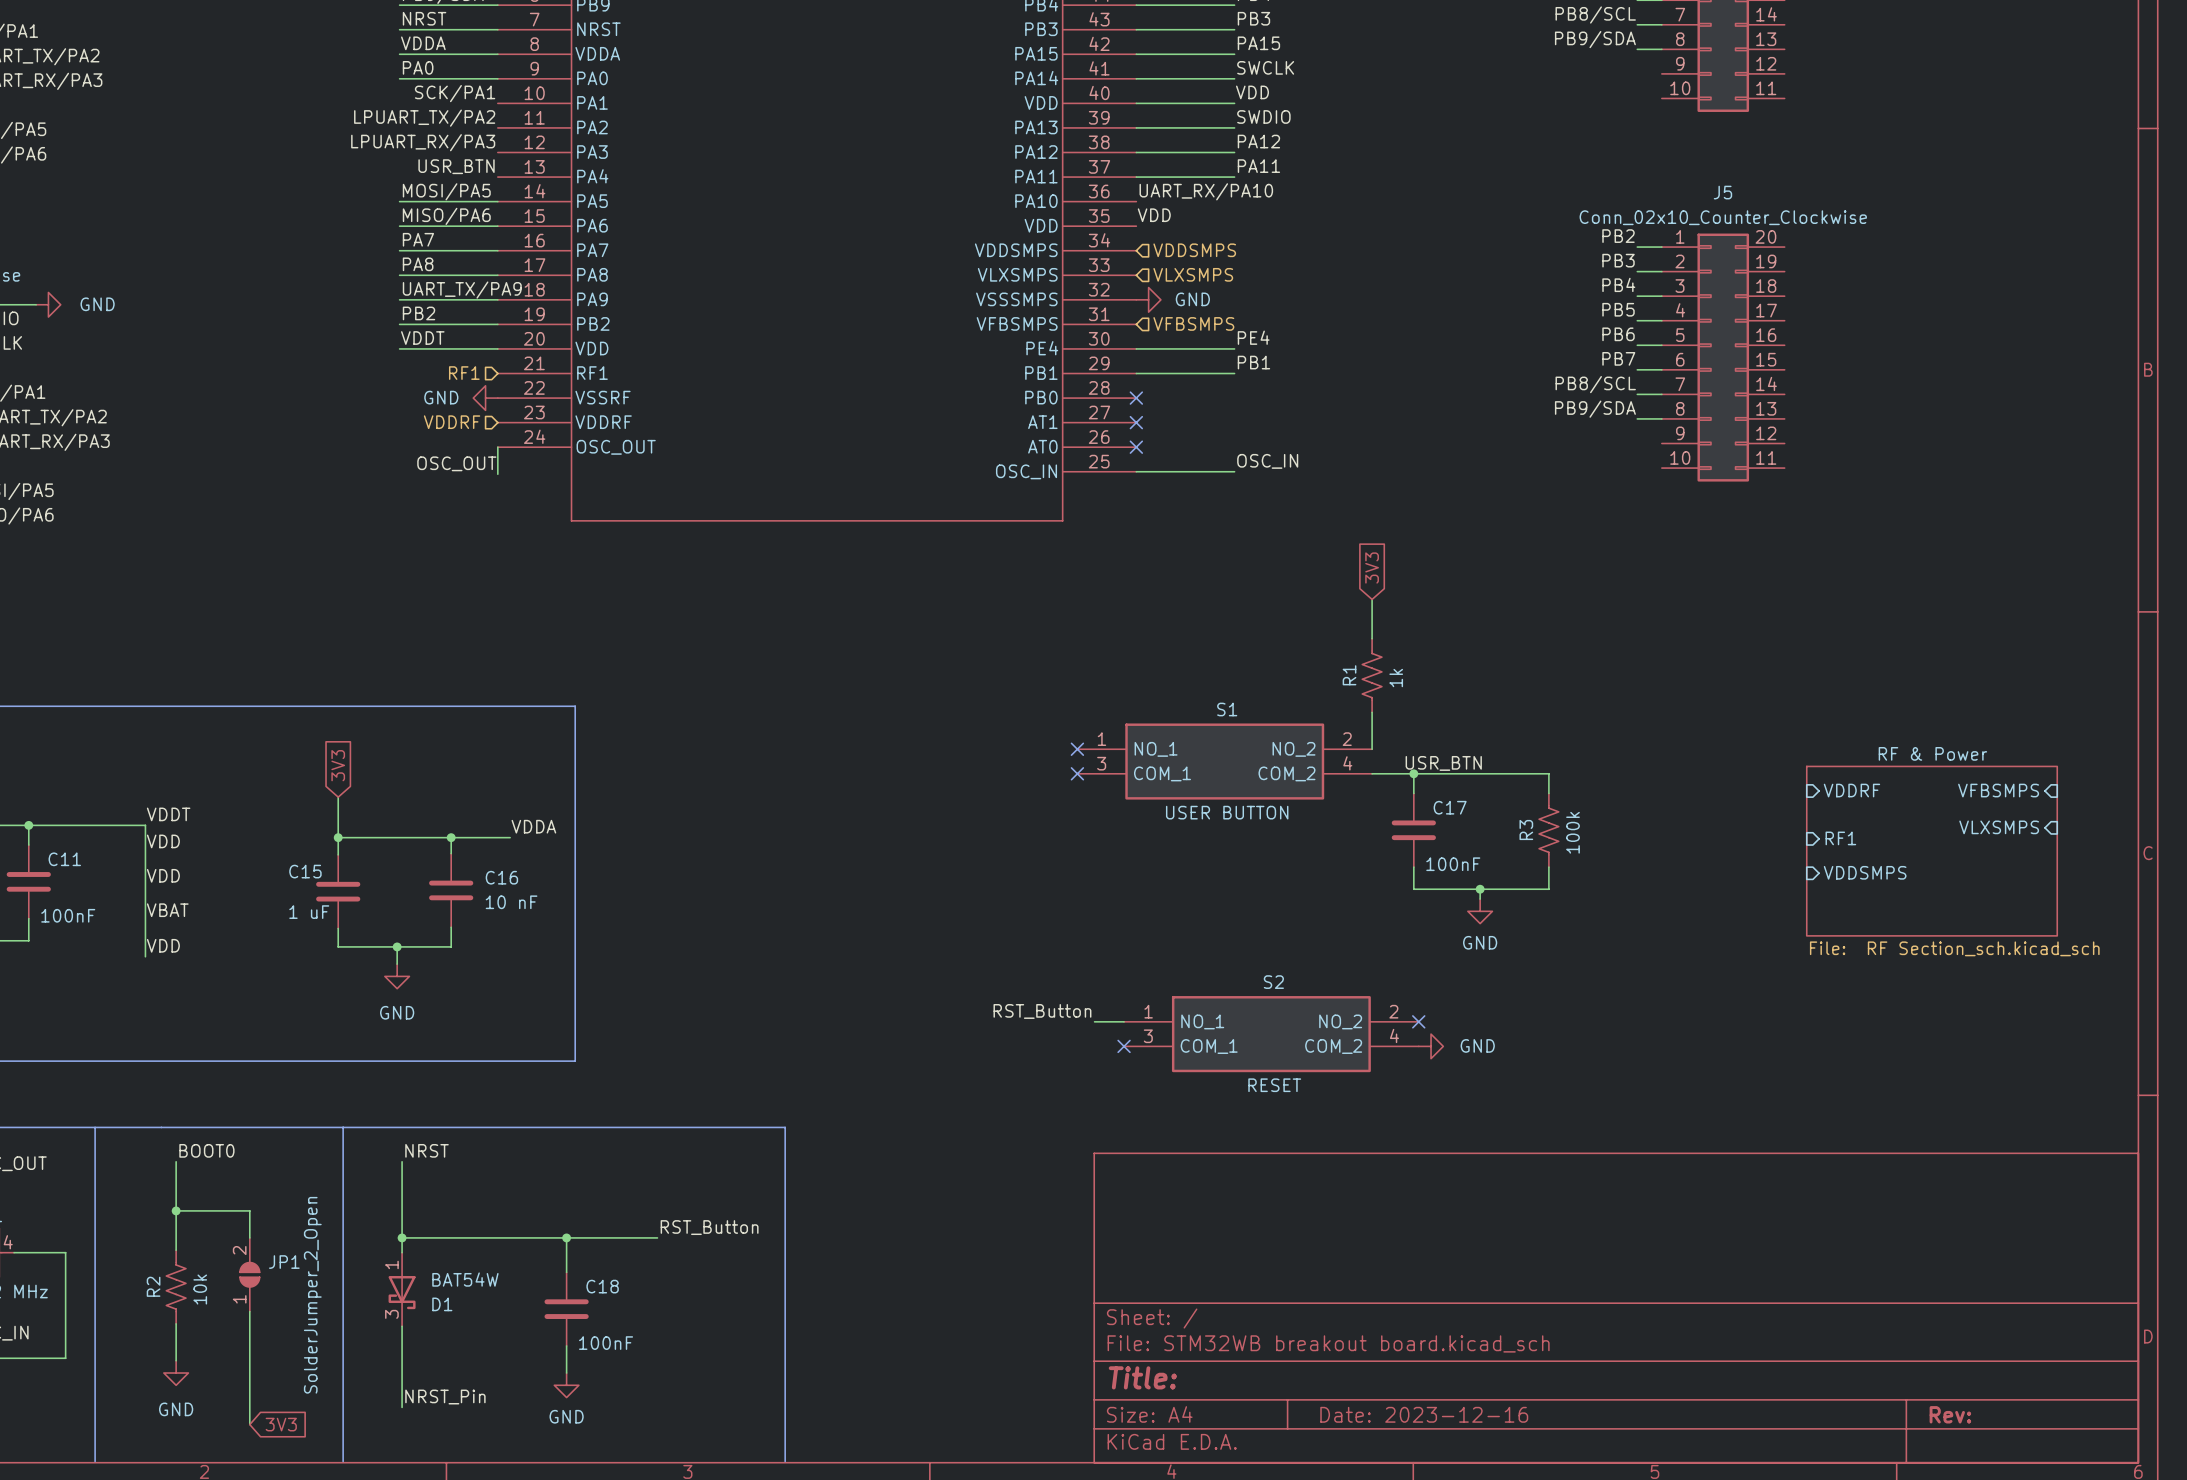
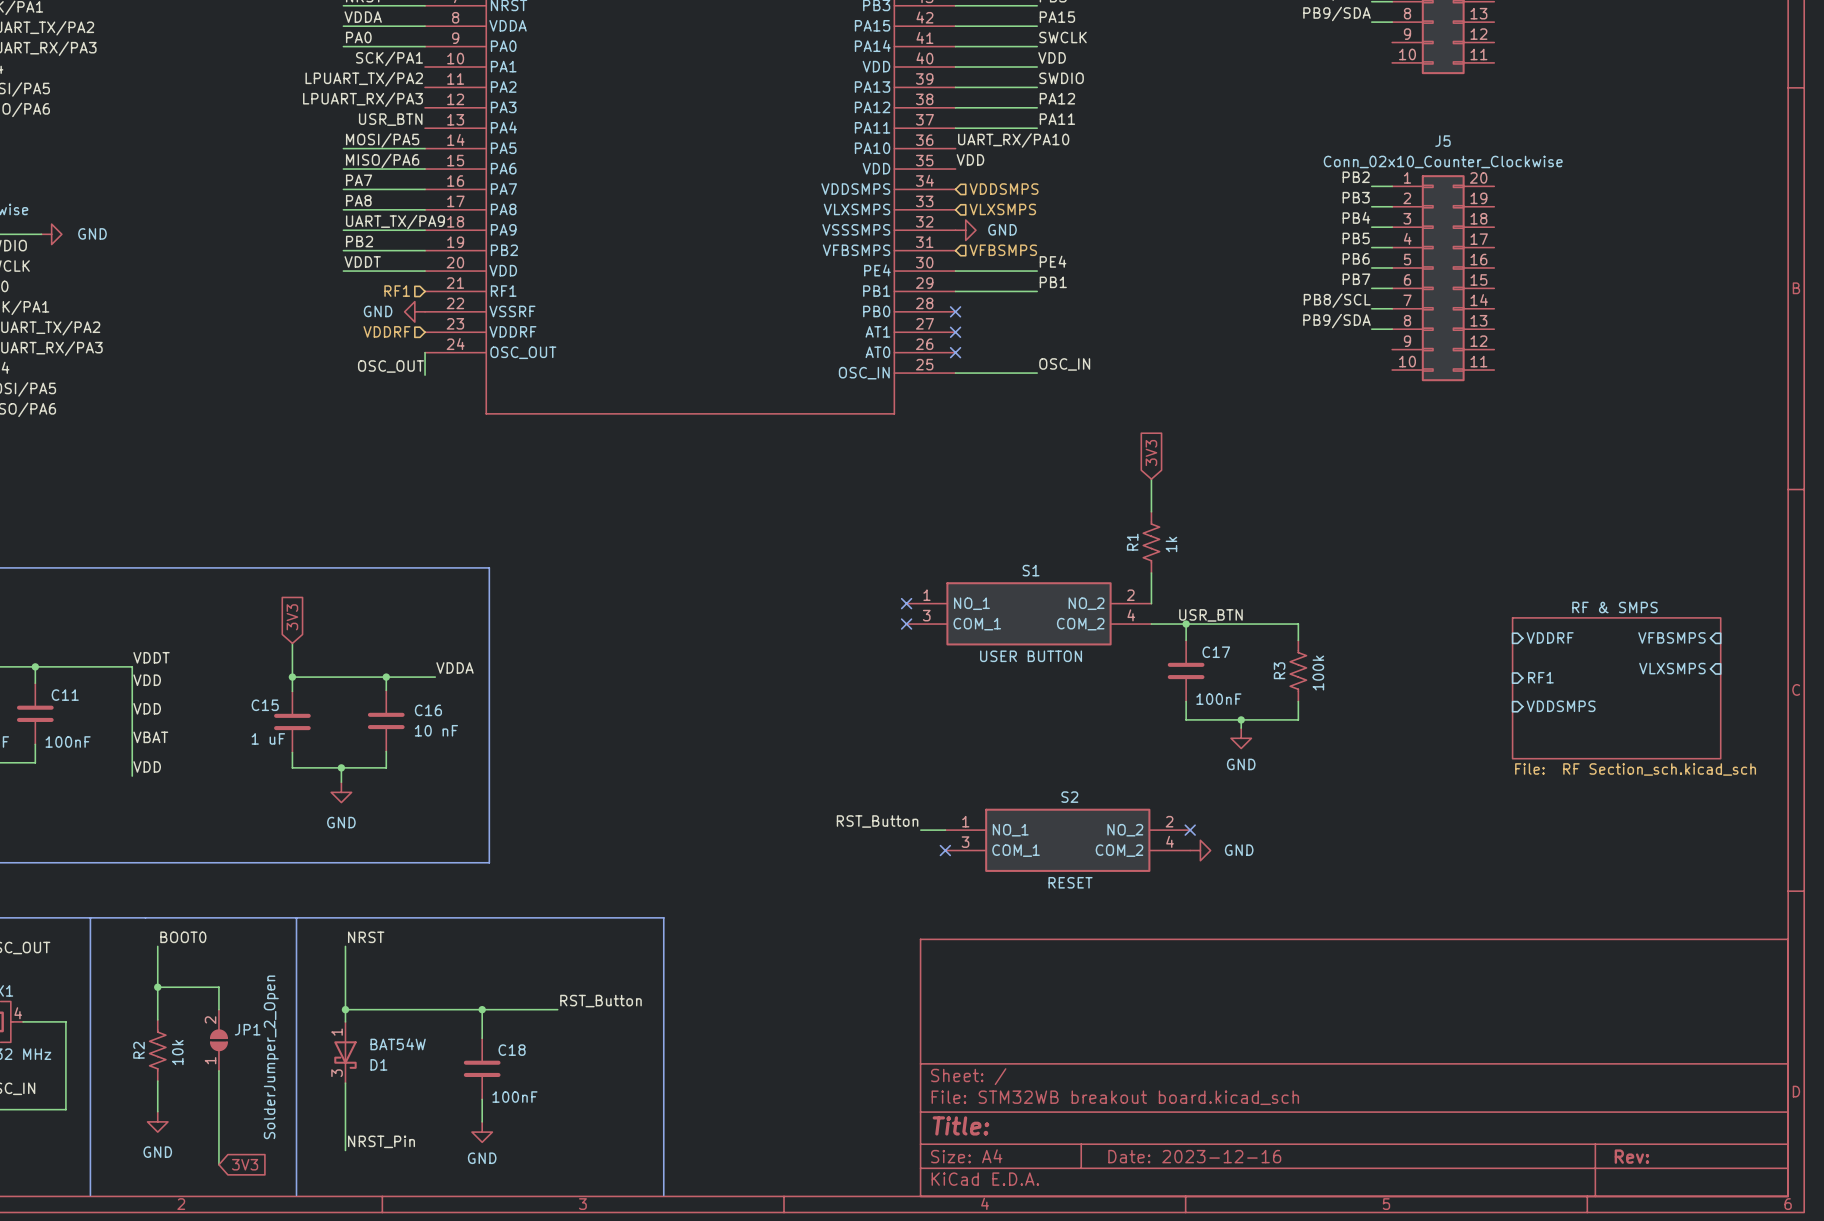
sheet RF & Power name: RF & Power (1932, 753) -> RF & SMPS (1614, 607)

